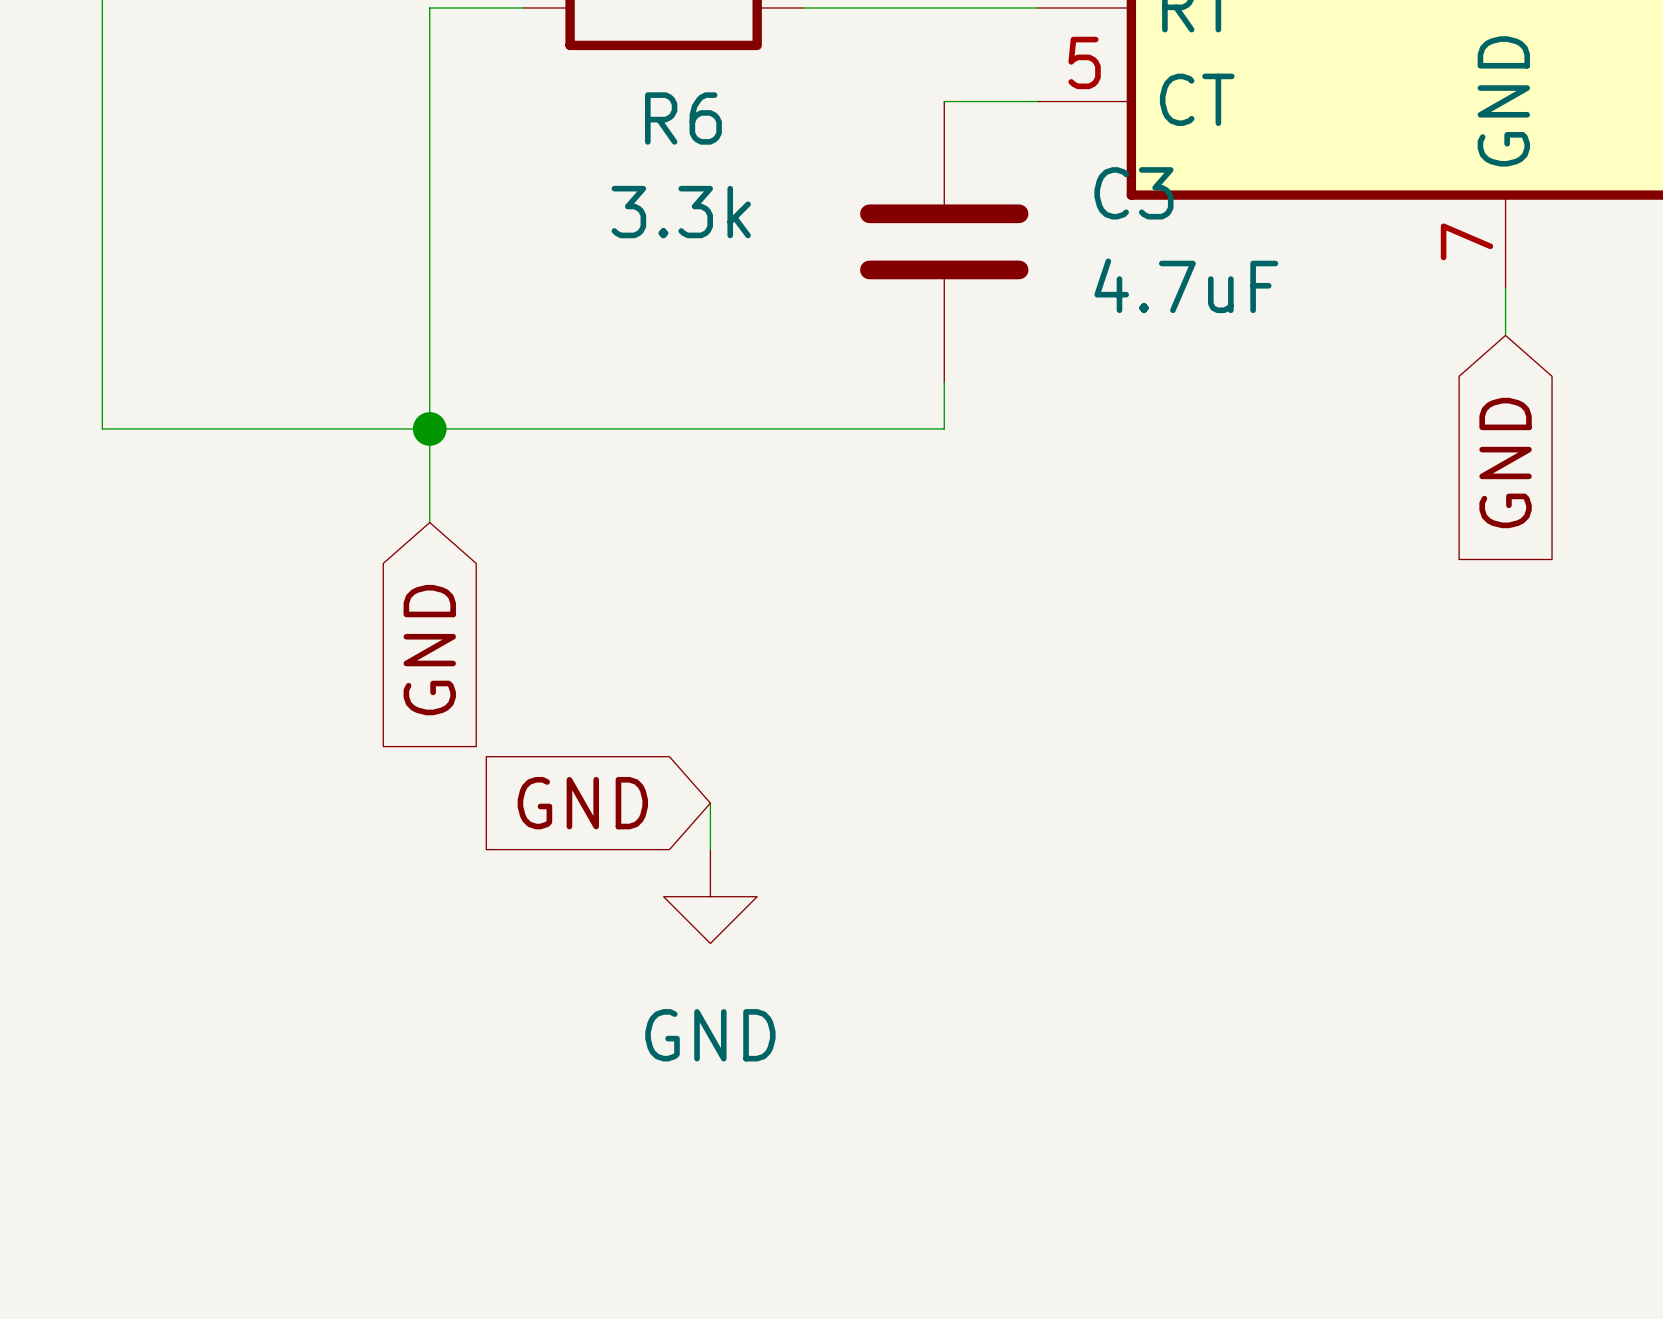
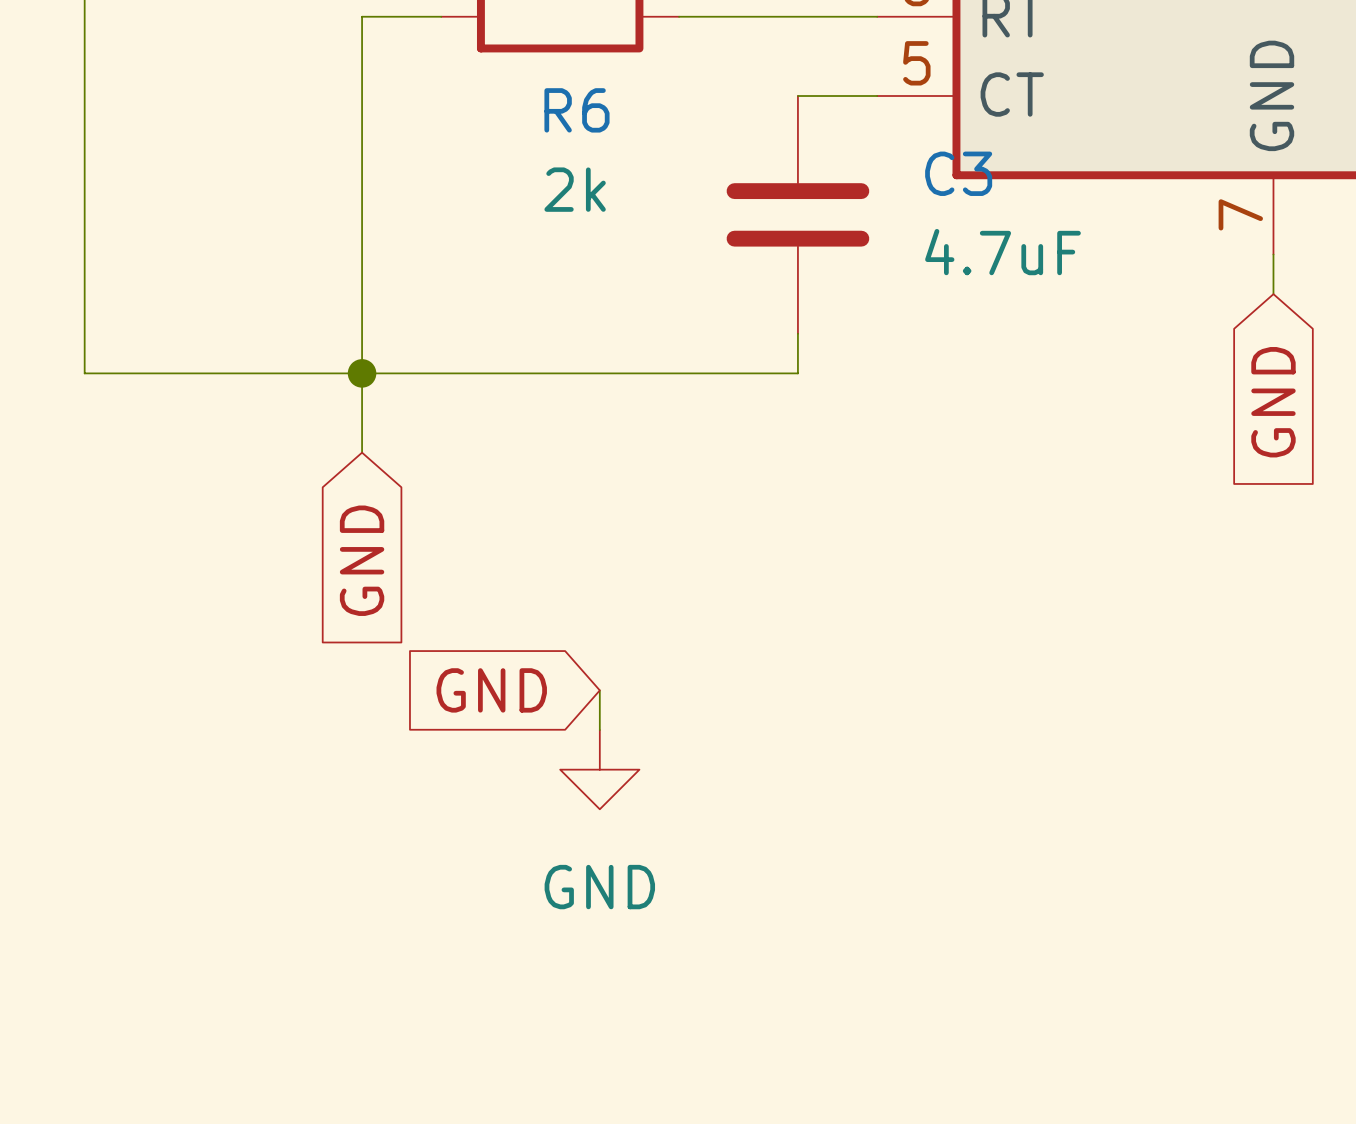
R6 value: 3.3k (681, 212) -> 2k (575, 189)

